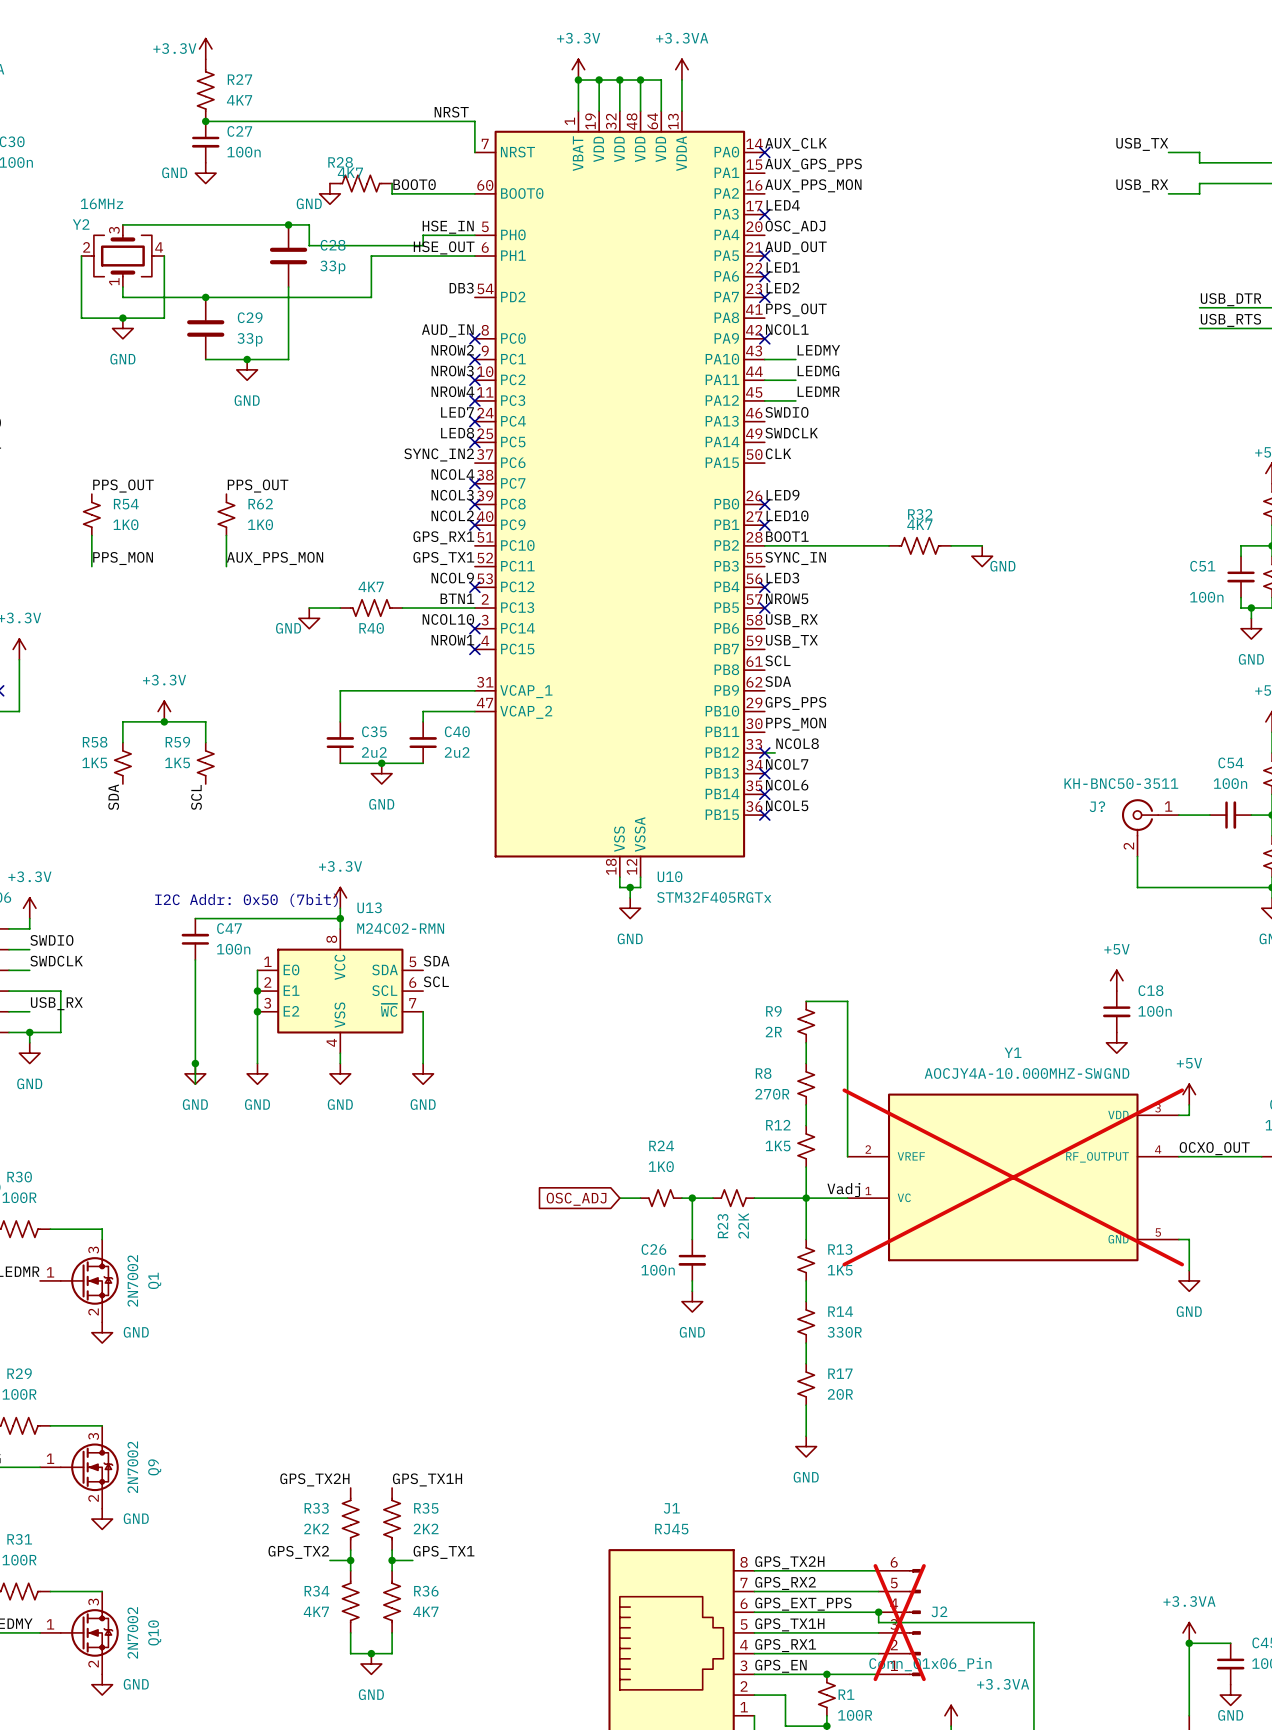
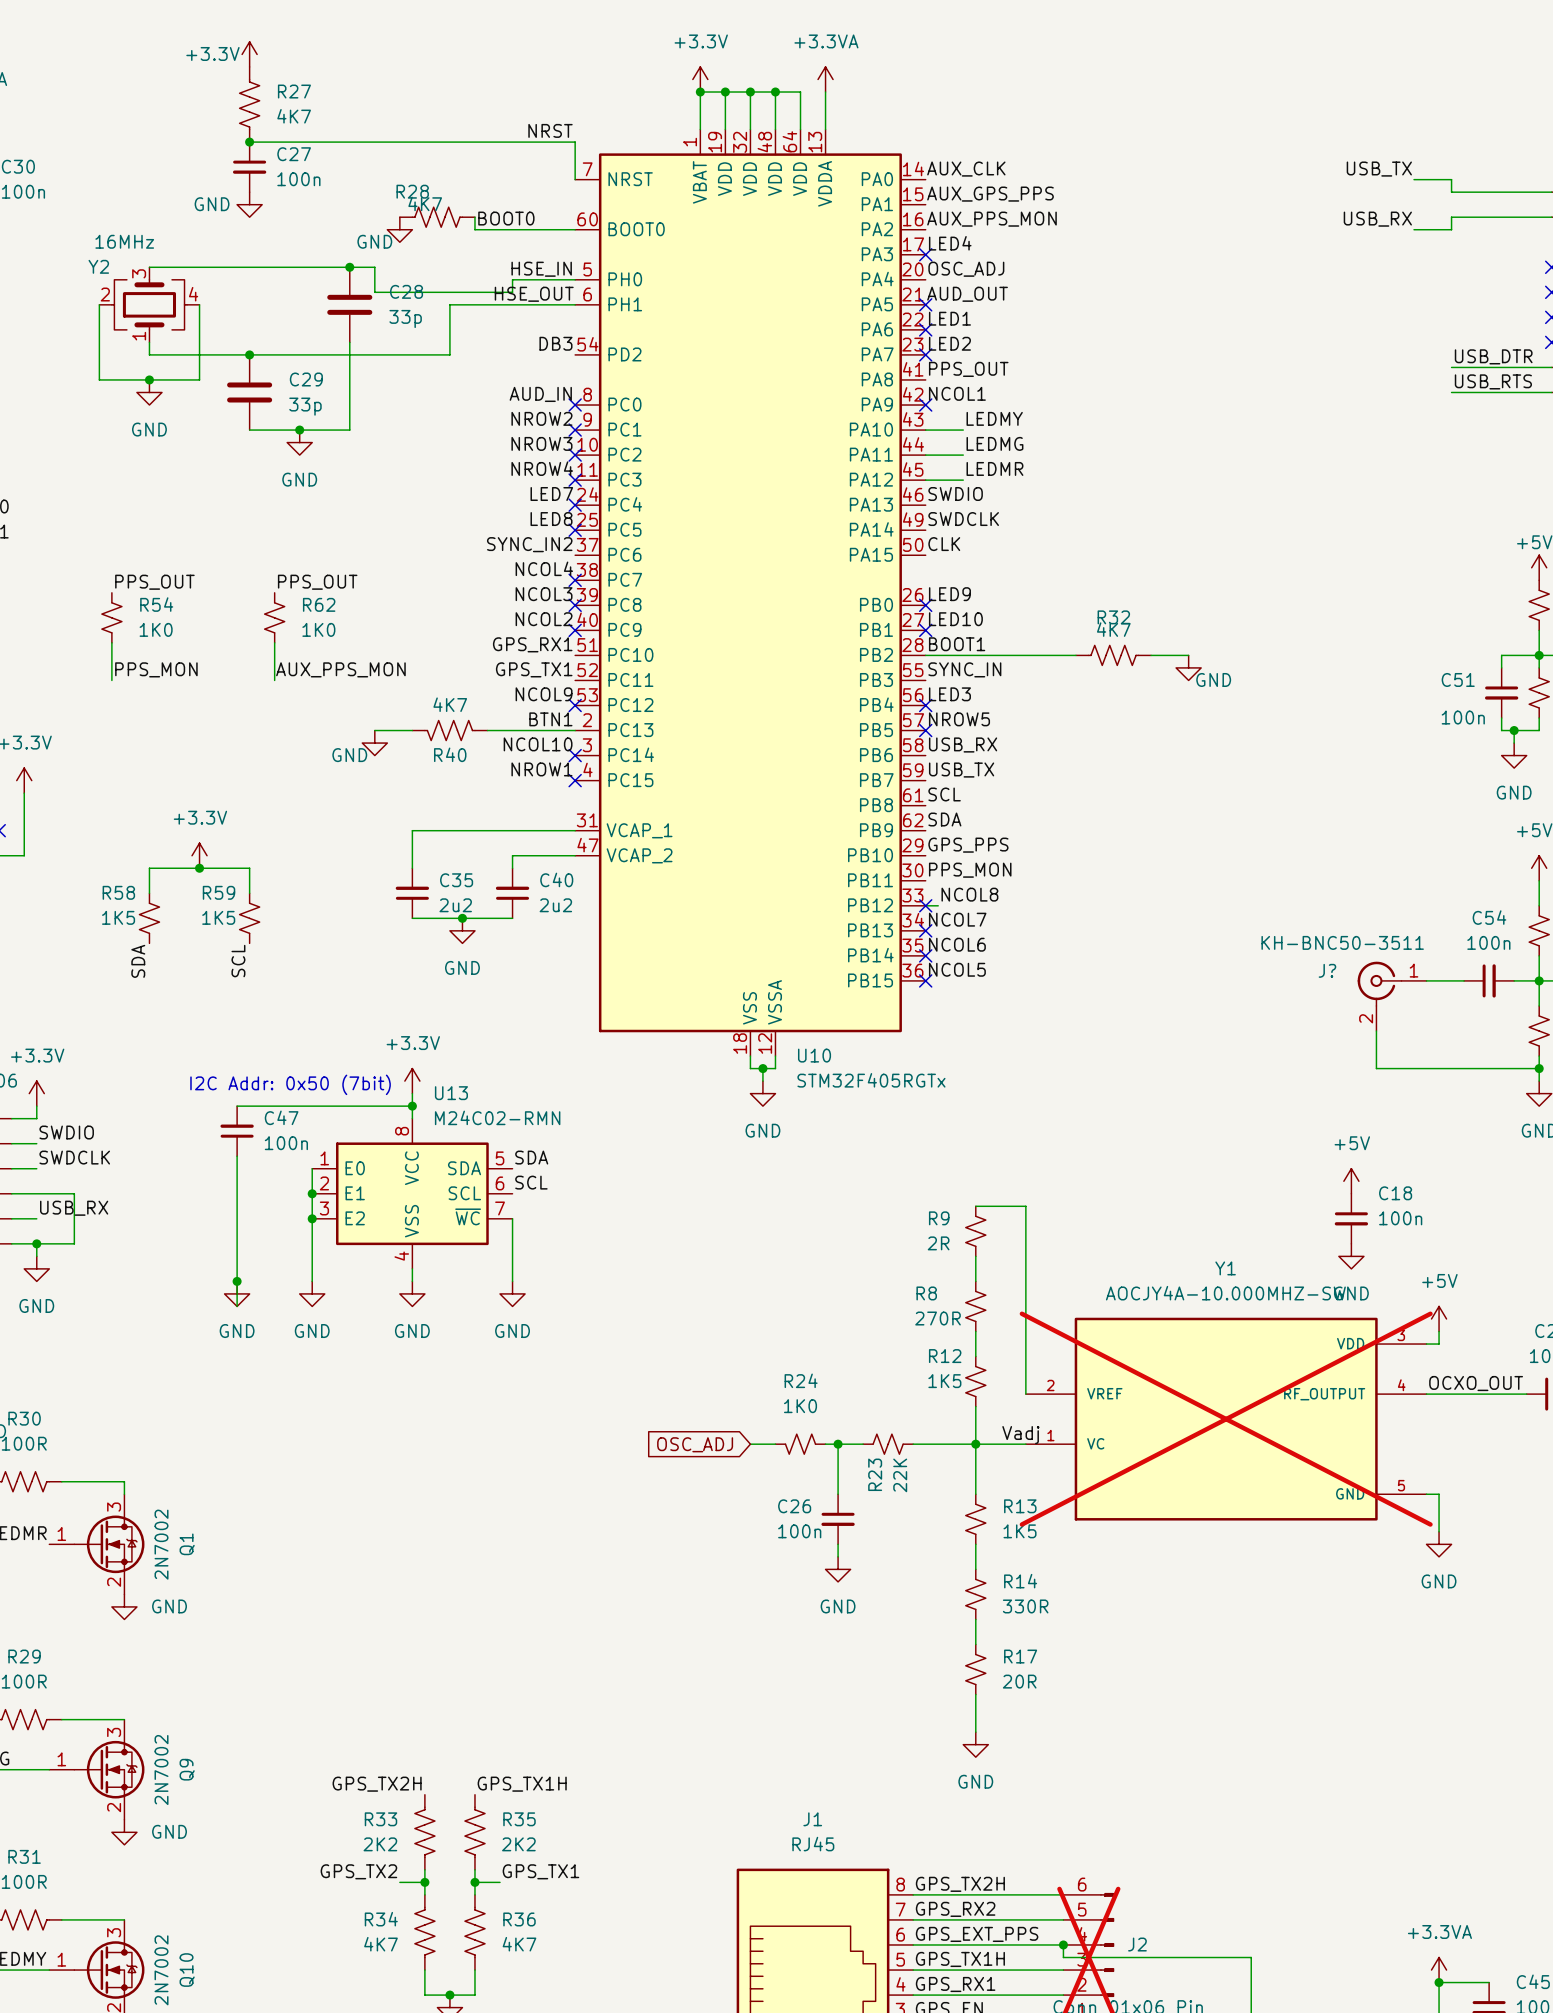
no-connect mark: (764, 152) -> none

